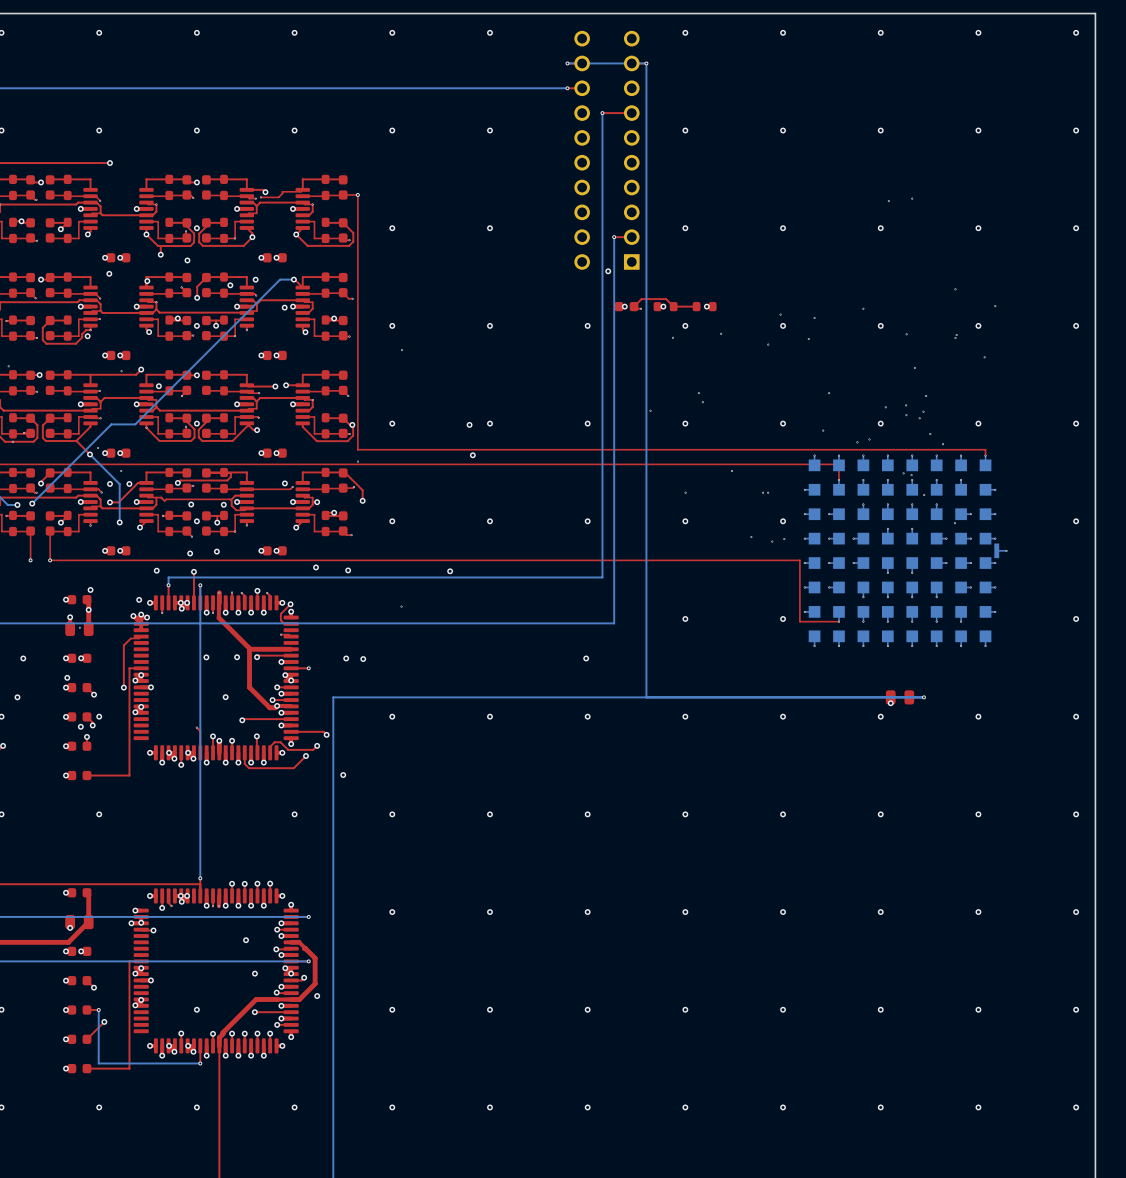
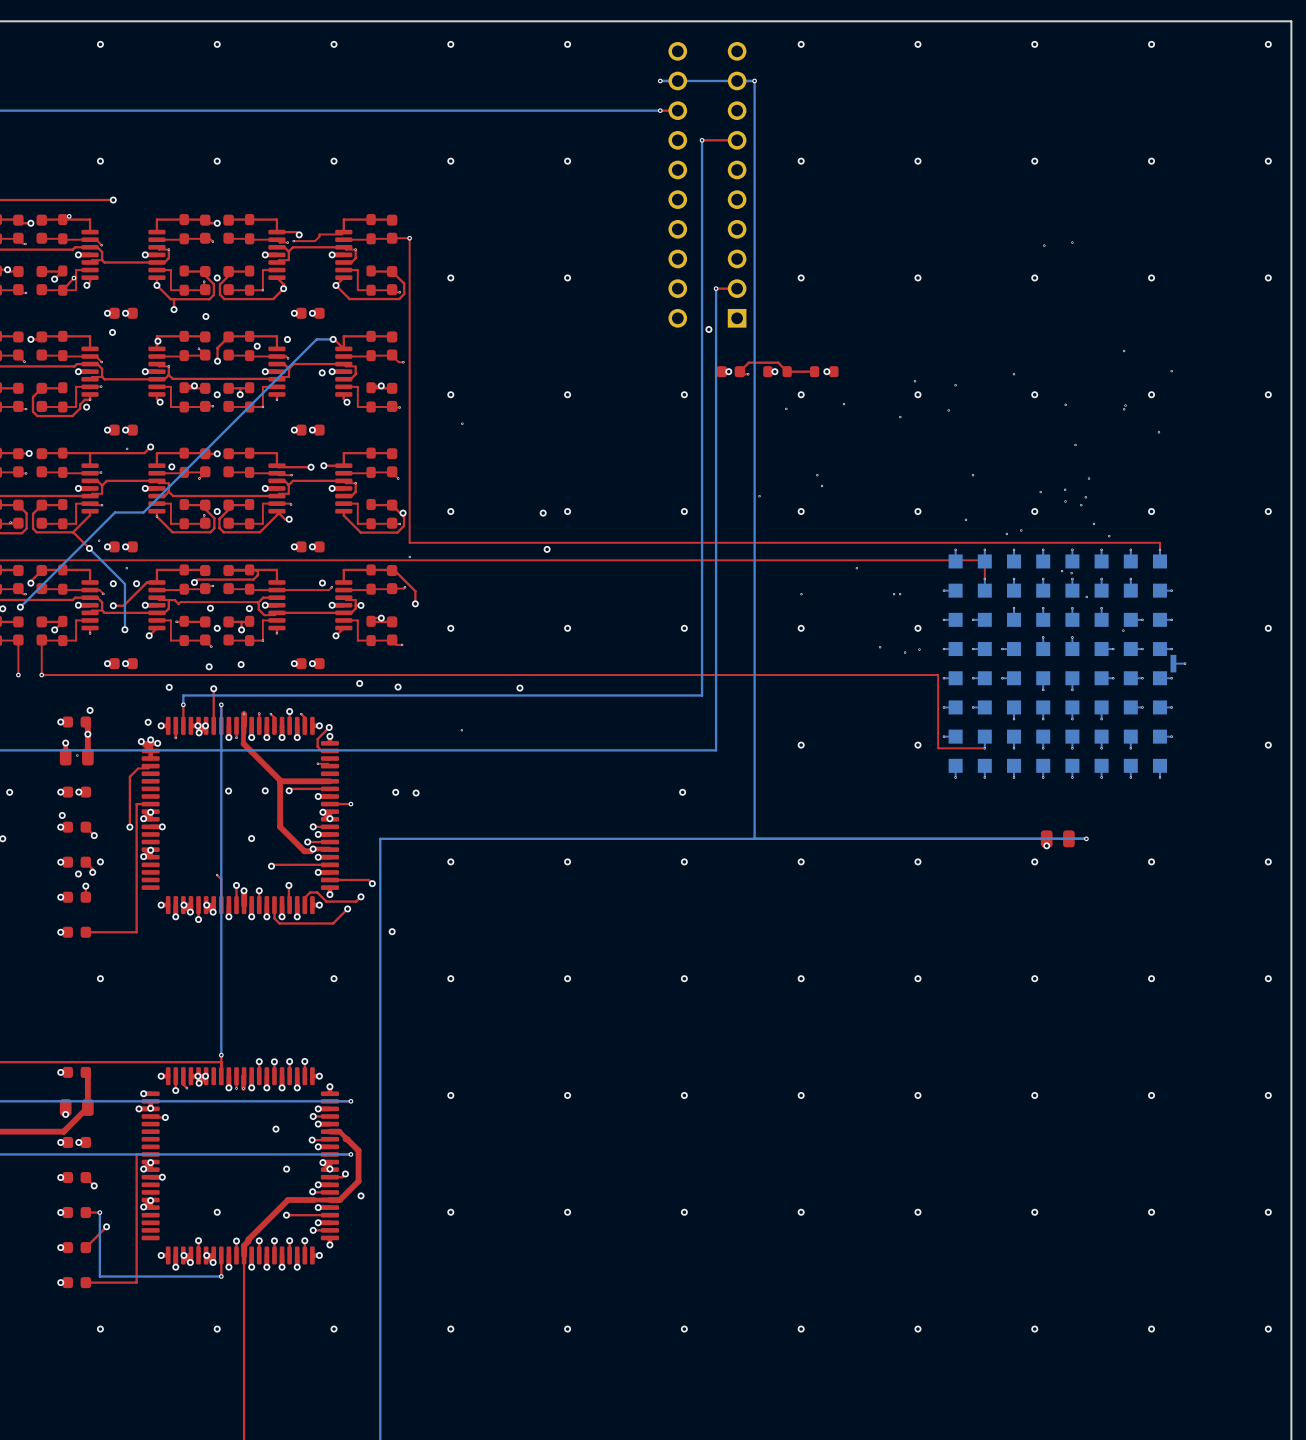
via: none -> (69, 216)
top track: none -> (73, 278) (62, 290)
via: none -> (73, 278)

